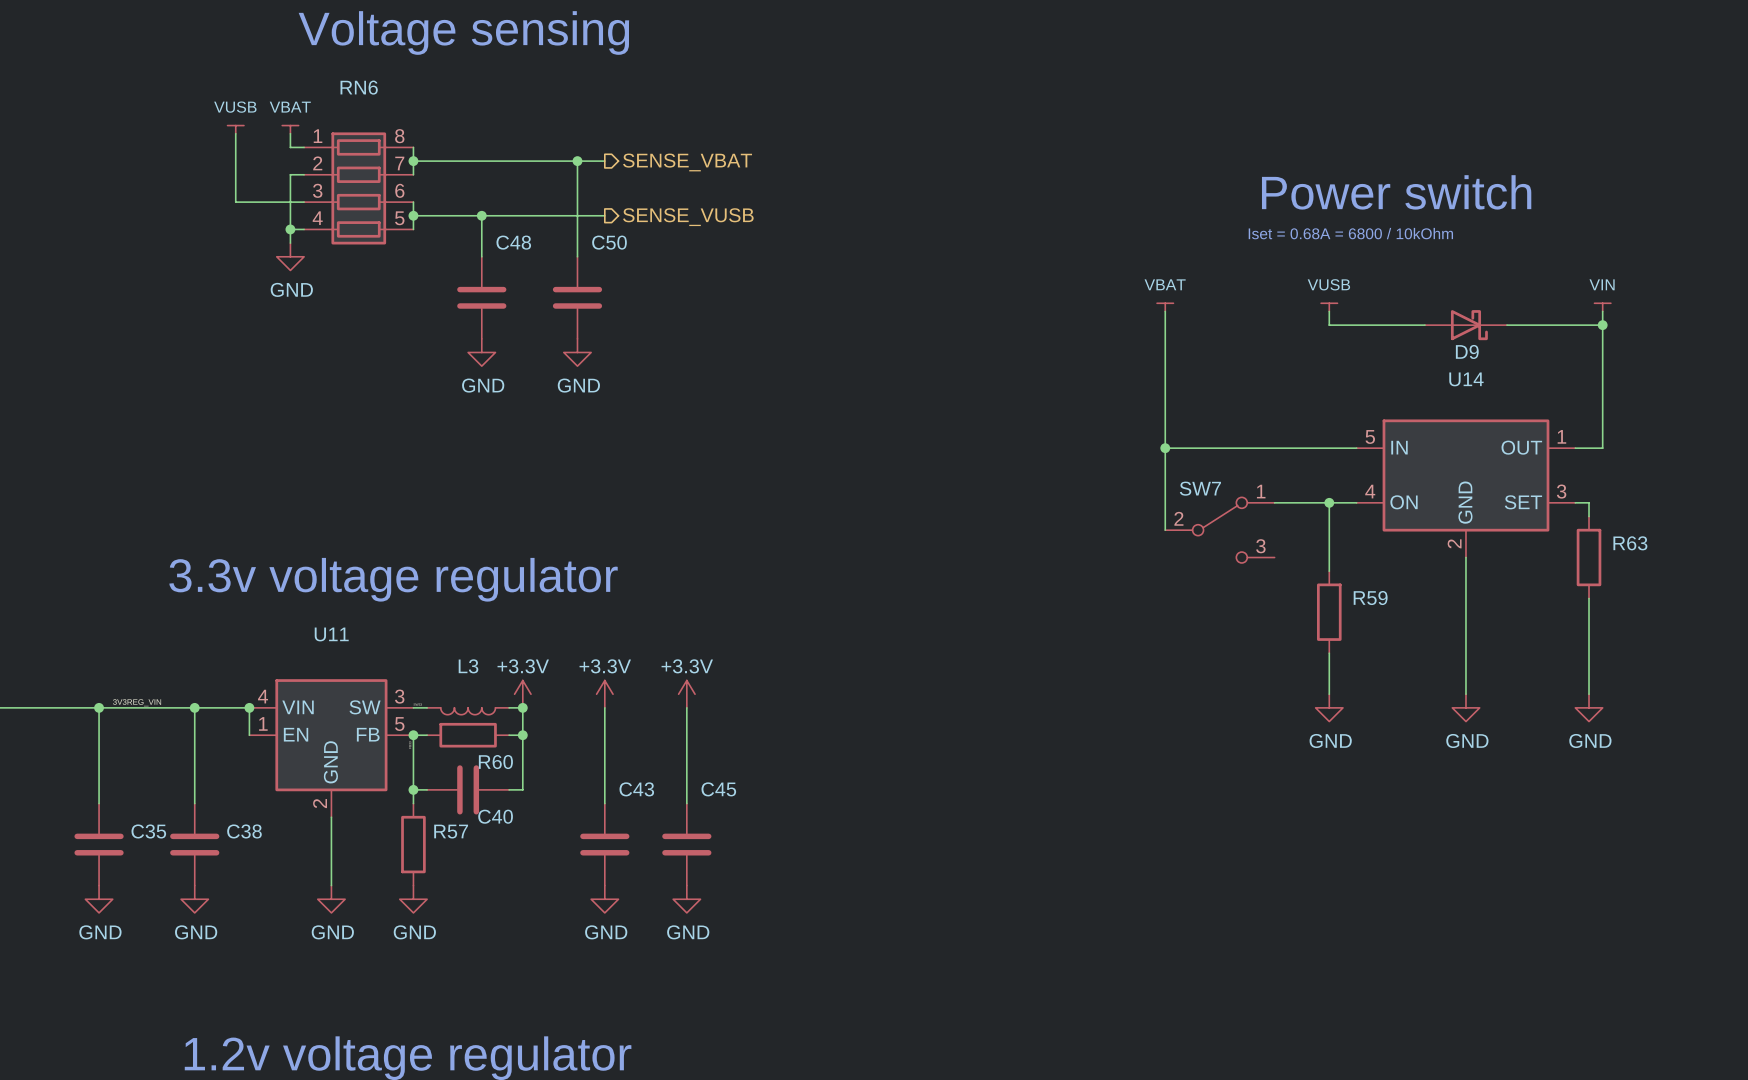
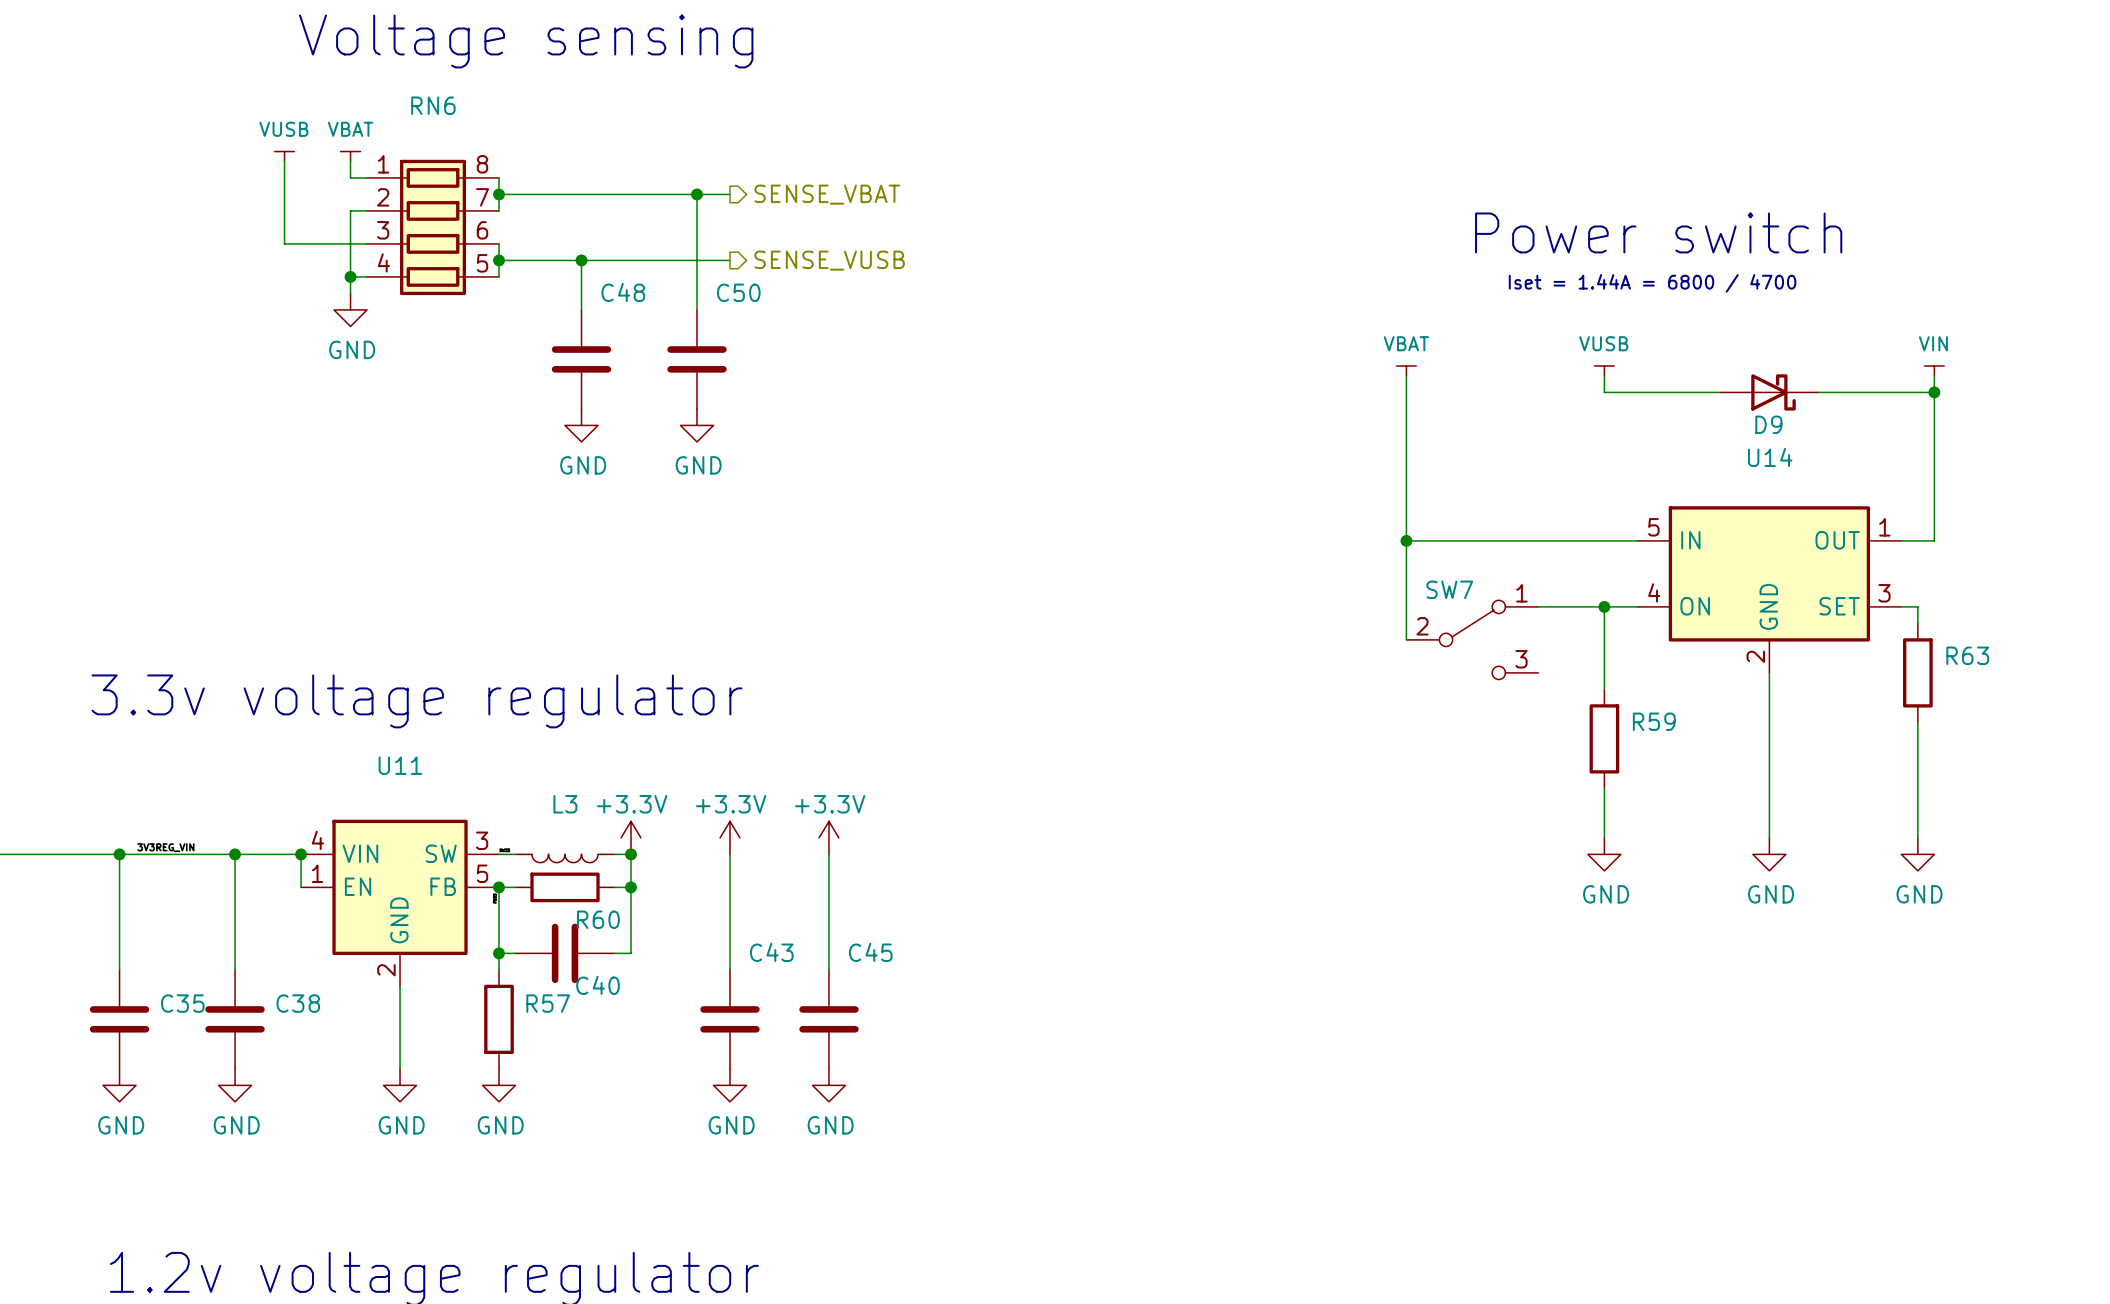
text: Iset = 0.68A = 6800 / 10kOhm (1350, 233) -> Iset = 1.44A = 6800 / 4700 (1652, 283)

